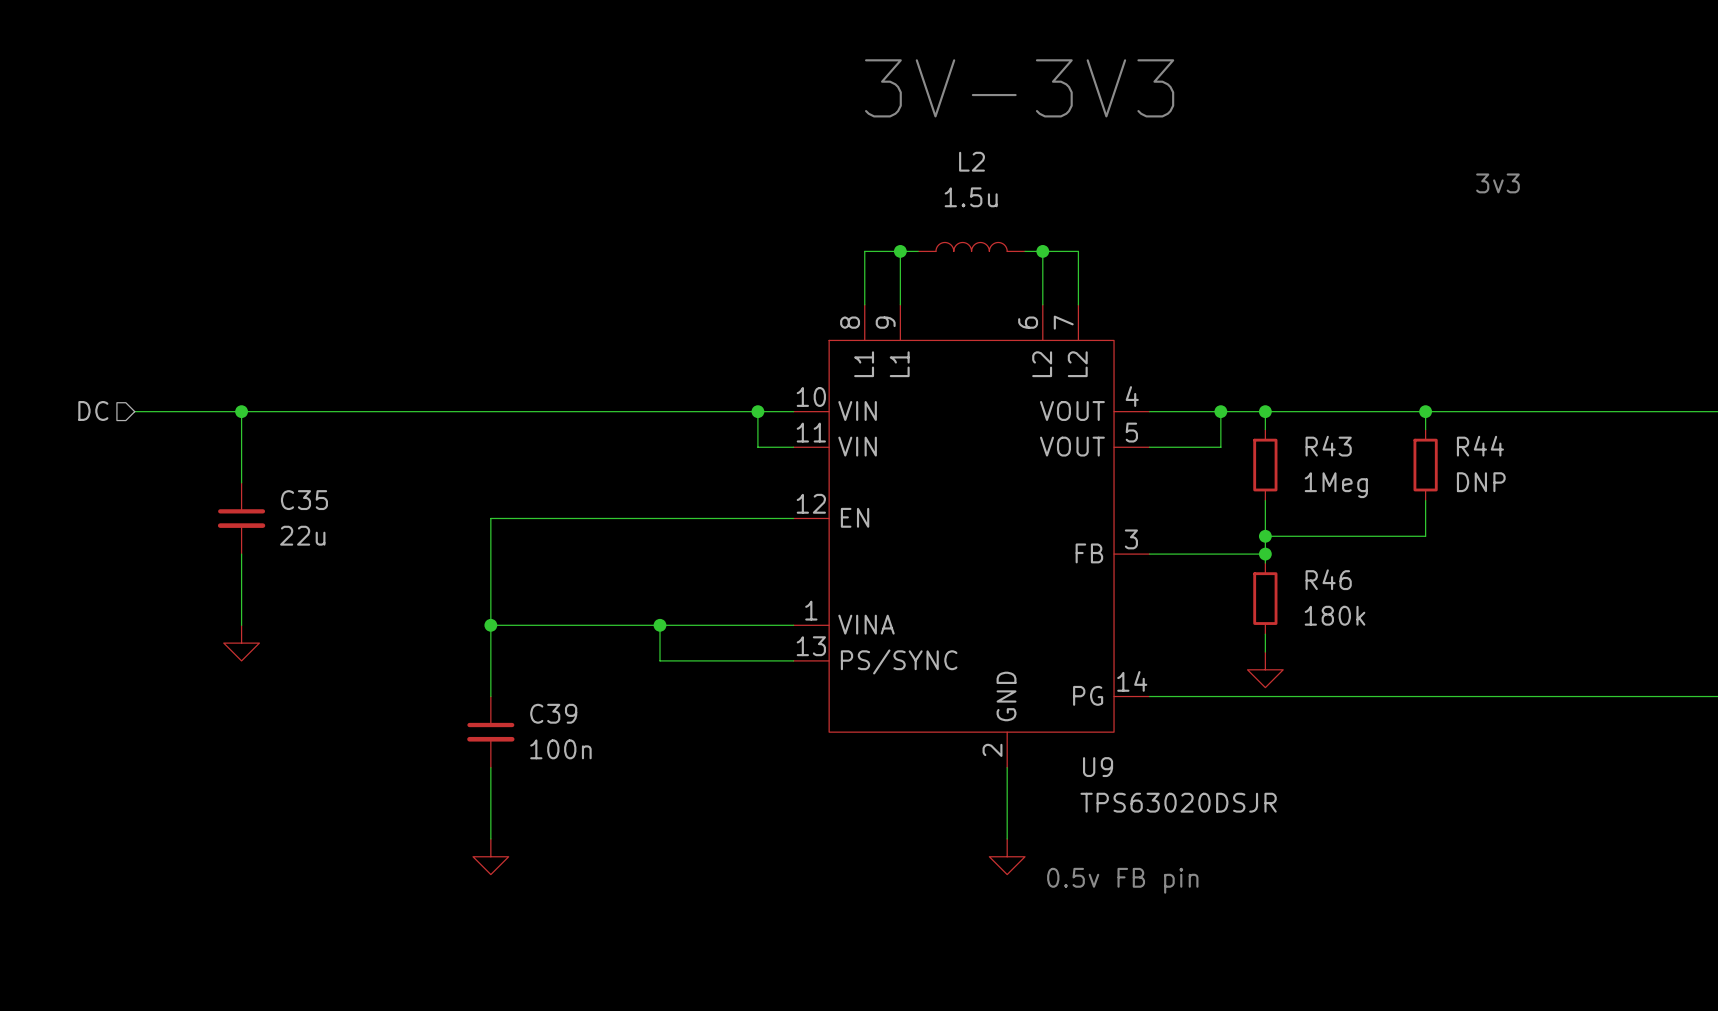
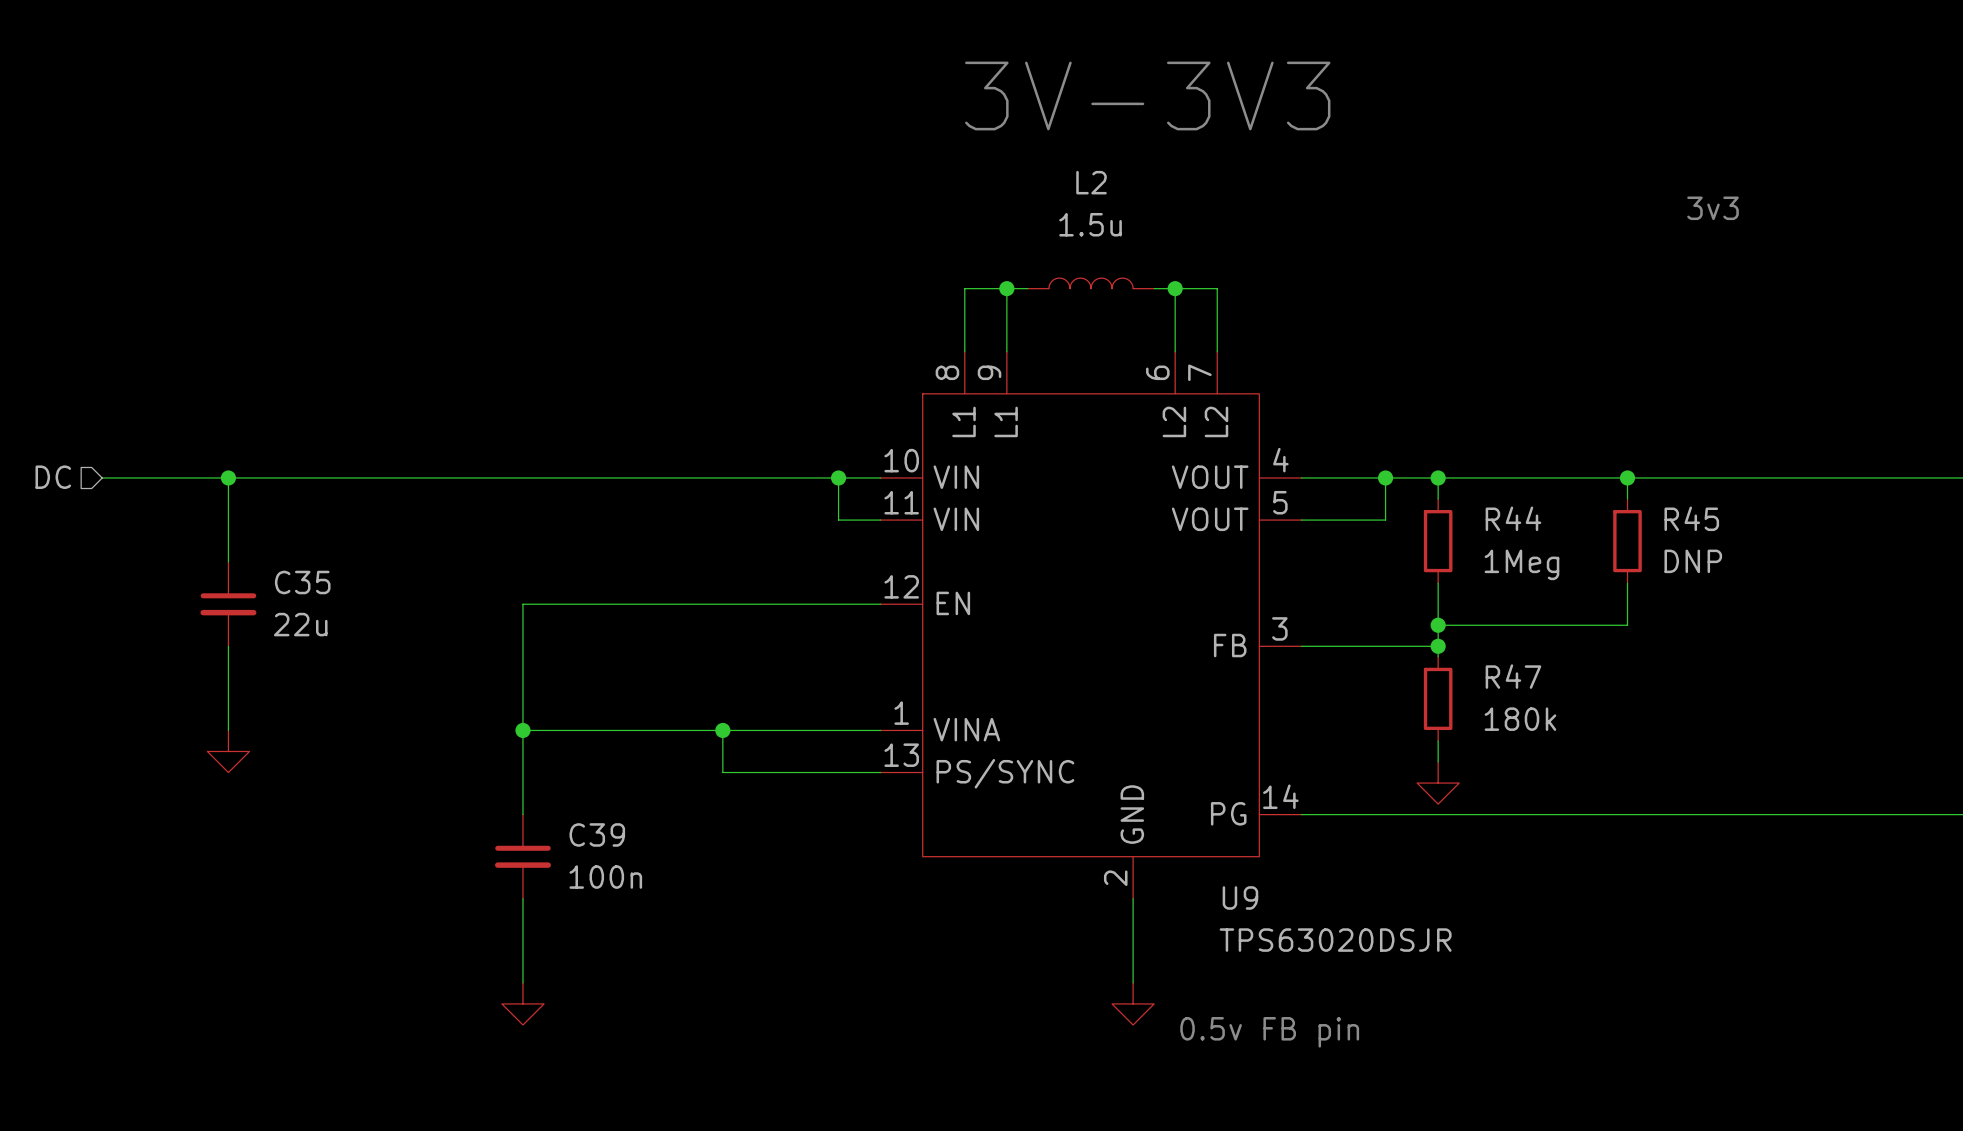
R43 name: R43 (1328, 446) -> R44 (1513, 518)
R44 name: R44 (1480, 446) -> R45 (1691, 518)
R46 name: R46 (1328, 579) -> R47 (1513, 676)

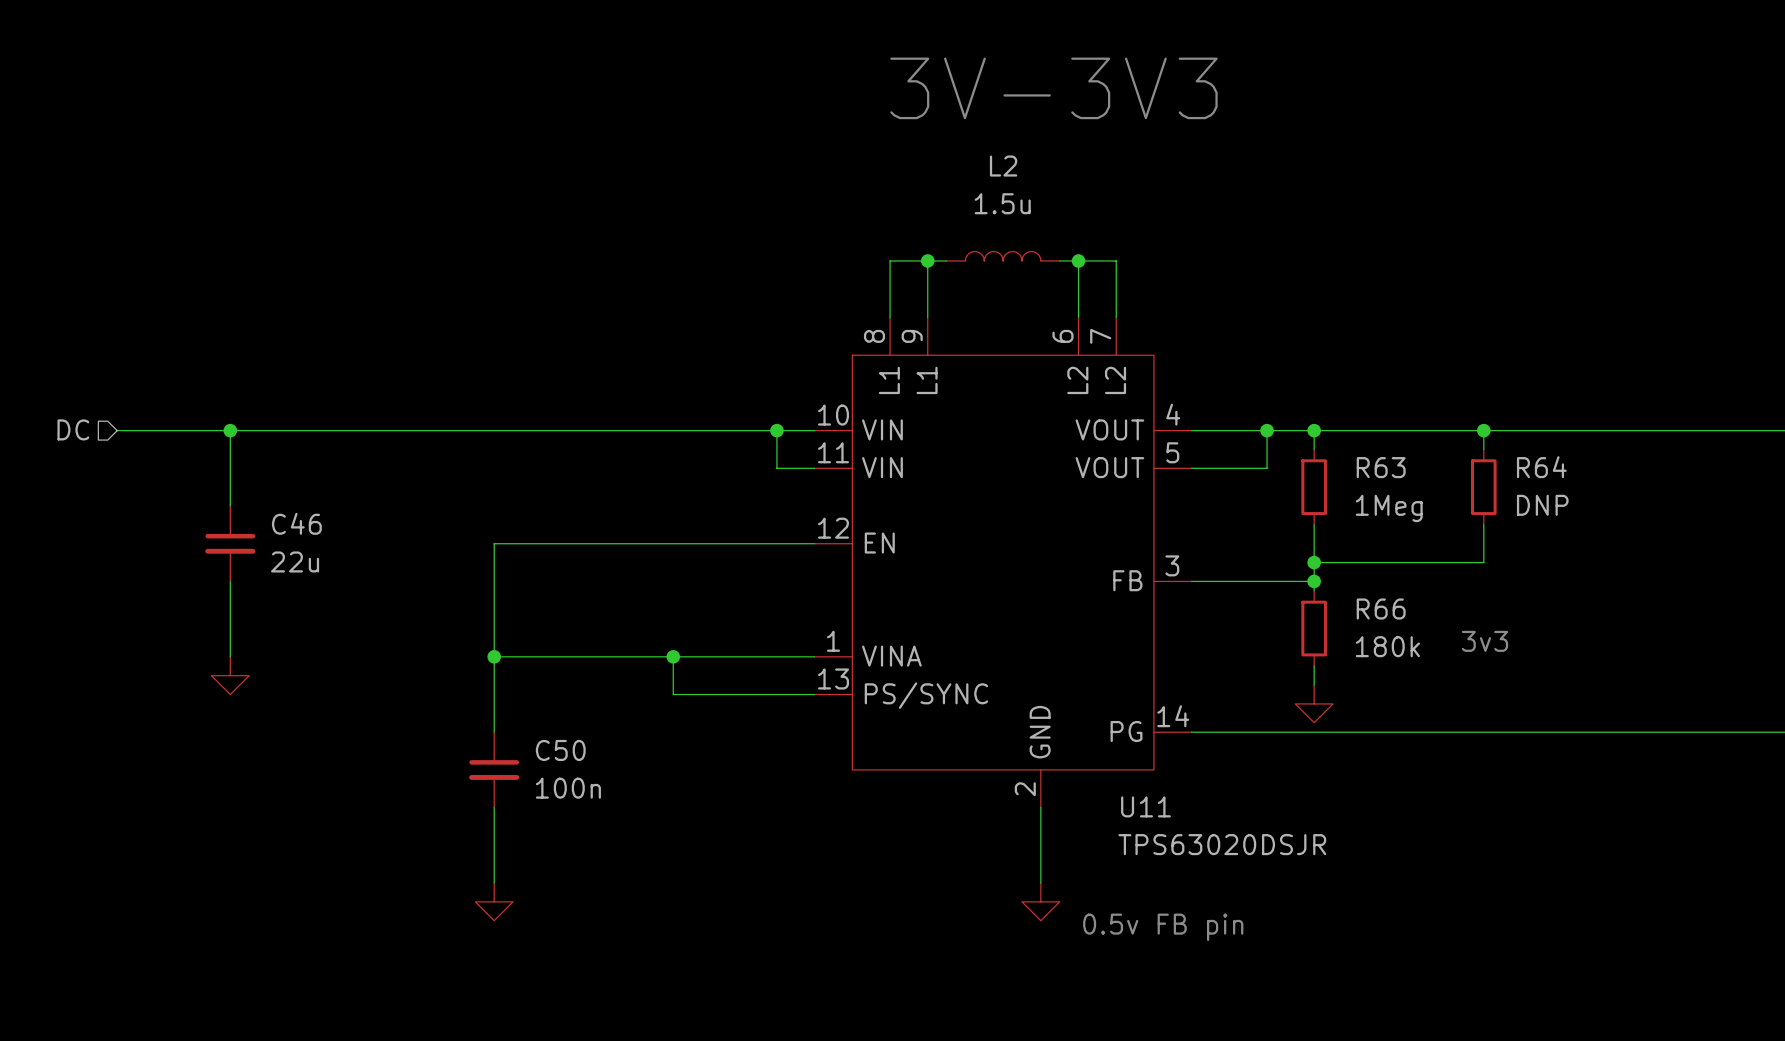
text: 3v3 (1713, 208) -> none
R44 name: R44 (1513, 518) -> R63 (1381, 467)
R45 name: R45 (1691, 518) -> R64 (1541, 467)
C35 name: C35 (302, 582) -> C46 (296, 523)
R47 name: R47 (1513, 676) -> R66 (1381, 608)
text: none -> 3v3 (1485, 641)
C39 name: C39 (597, 834) -> C50 (560, 750)
U9 name: U9 (1240, 897) -> U11 (1146, 806)

